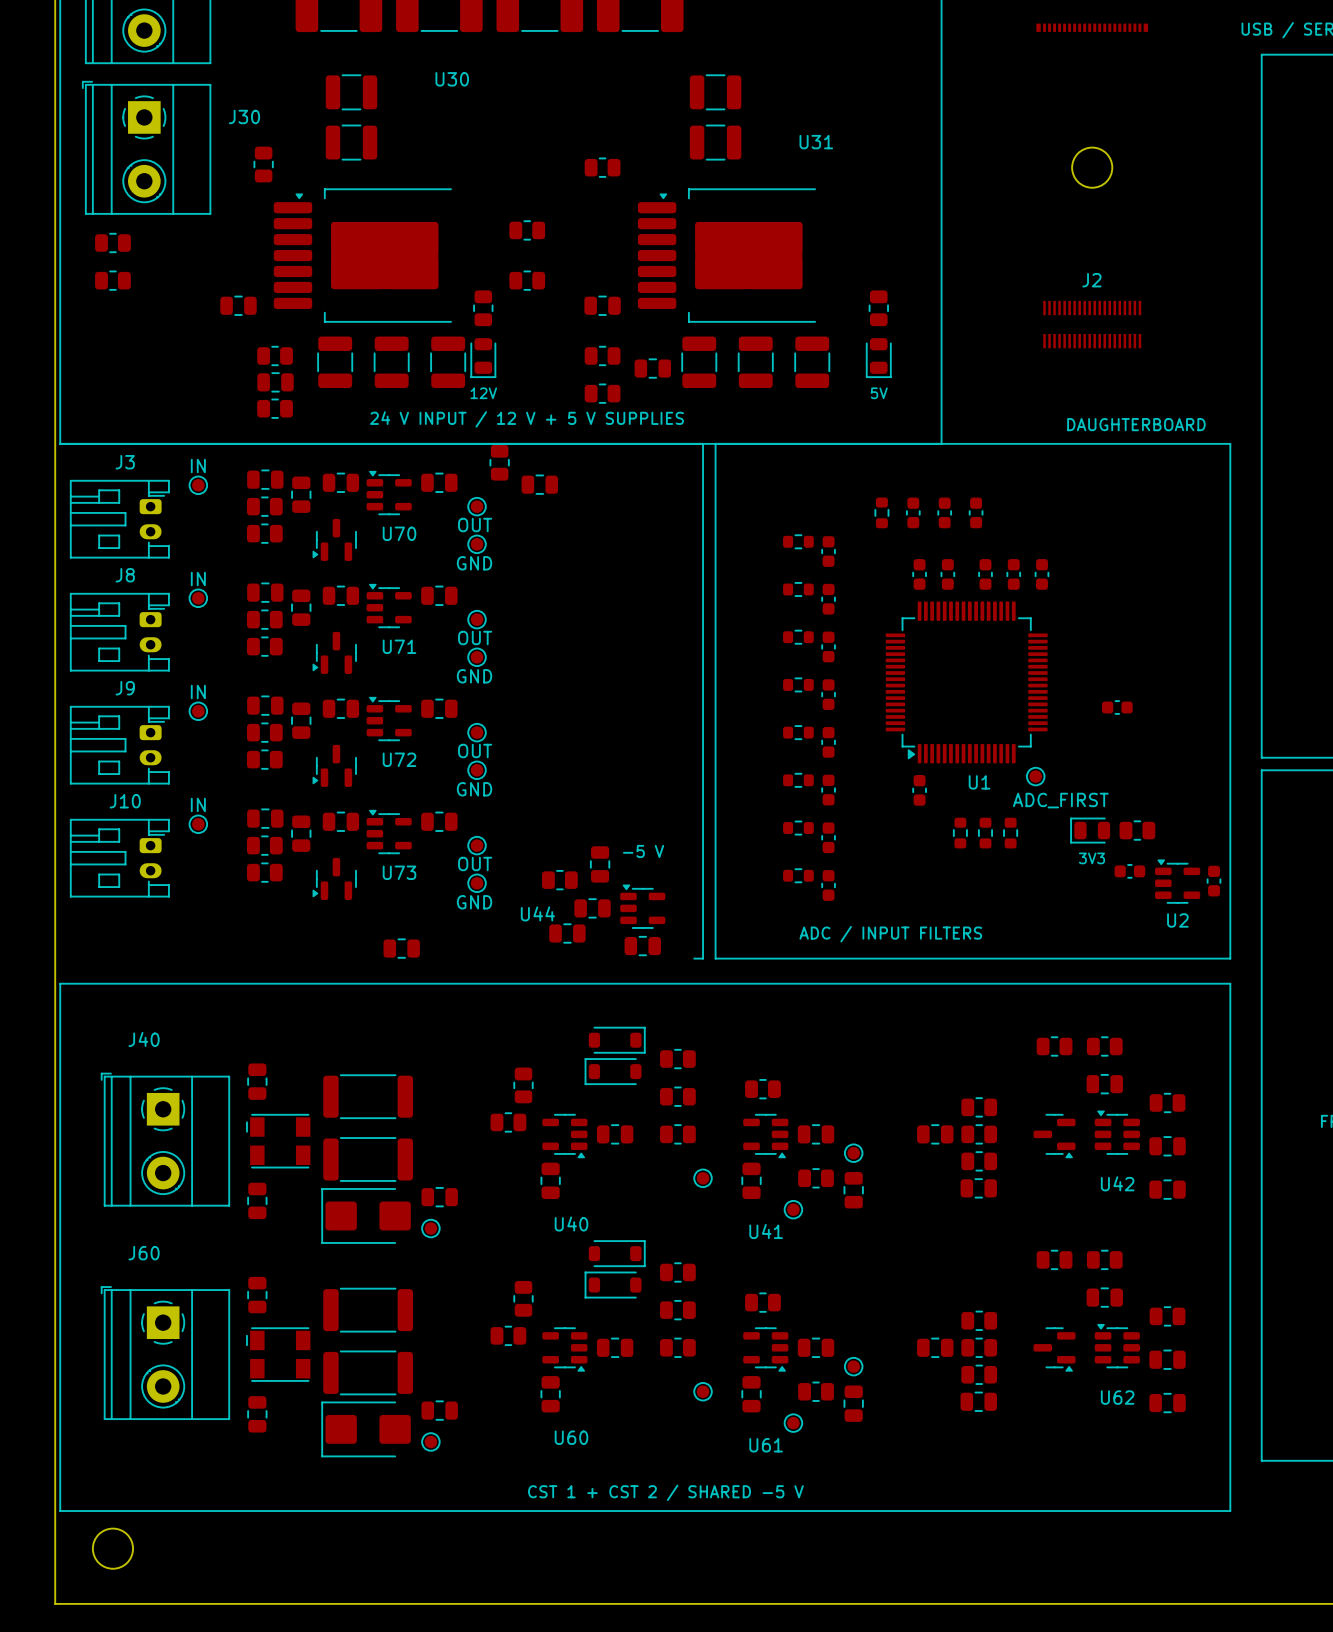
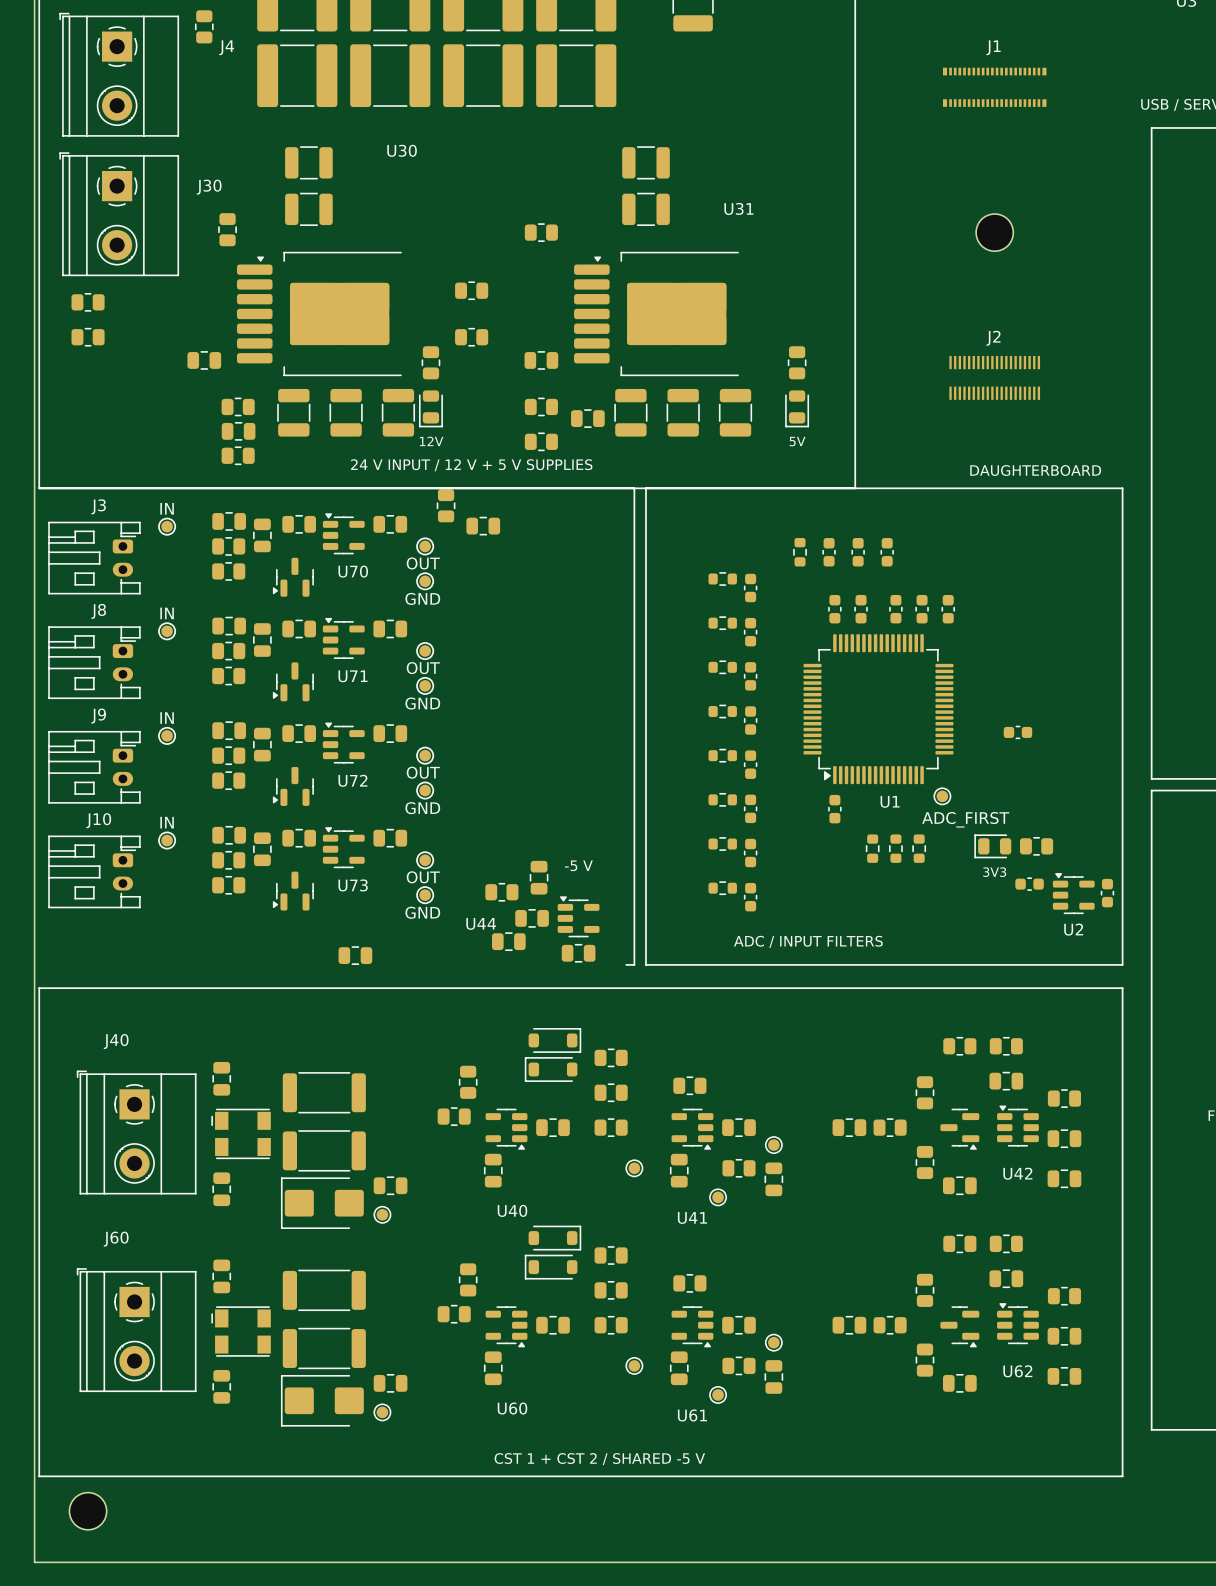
part: none -> (924, 1092)
part: (979, 1107) -> none
part: (979, 1161) -> none
part: none -> (924, 1162)
part position: (978, 1188) -> (959, 1185)
part: none -> (924, 1290)
part: (979, 1320) -> none
part: (979, 1374) -> none
part: none -> (924, 1360)
part position: (978, 1401) -> (959, 1383)

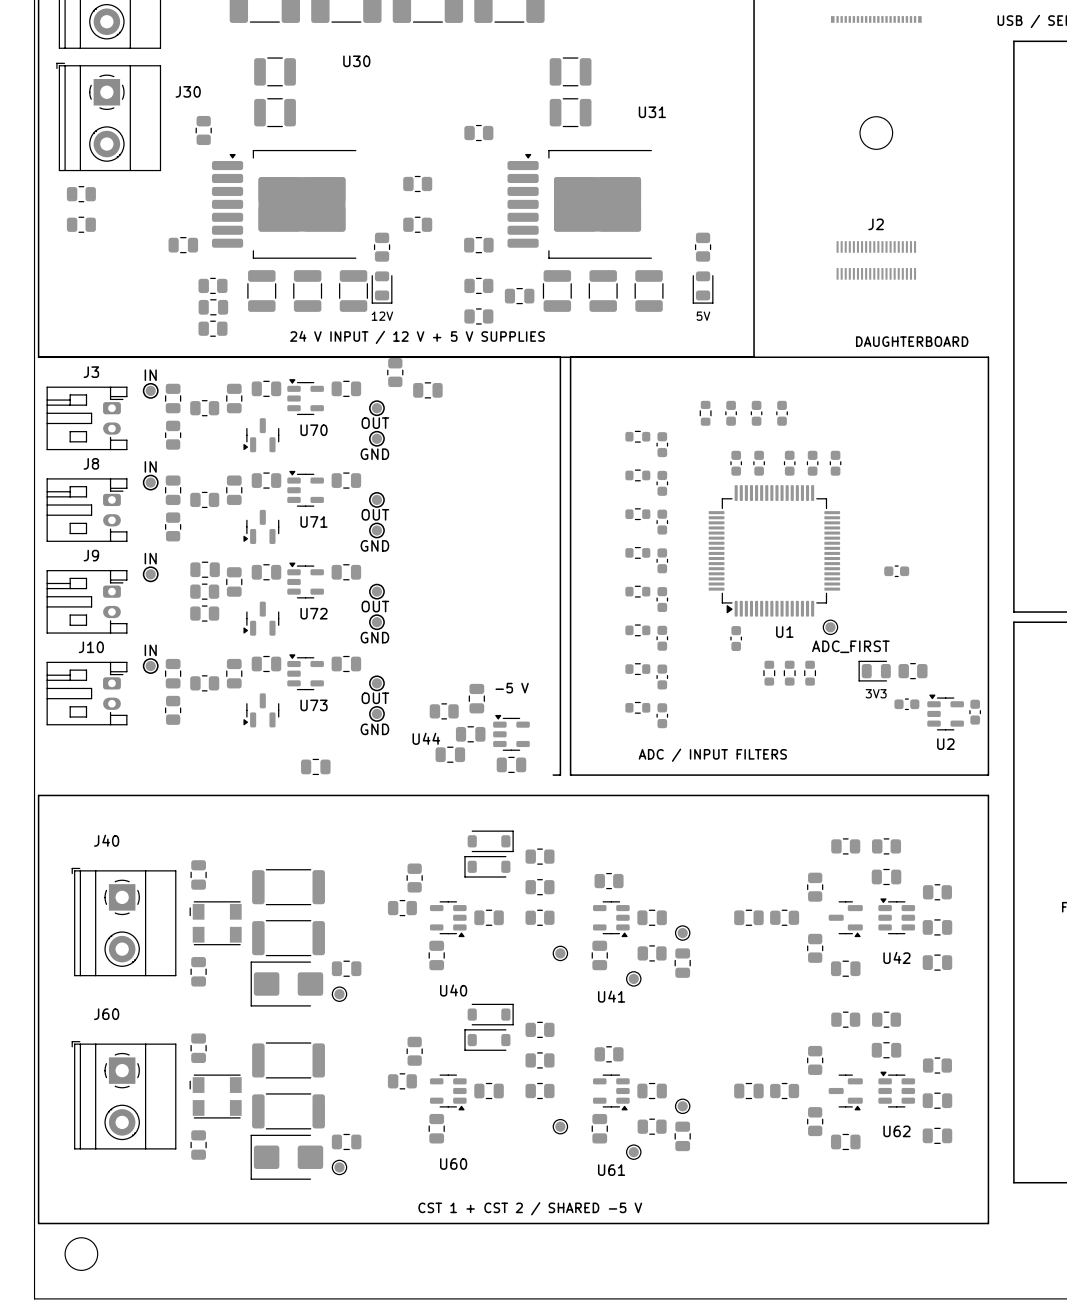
part rotation: 0° (229, 521) -> 90° clockwise (173, 398)
part position: (229, 521) -> (173, 398)
part rotation: 0° (228, 571) -> 90° clockwise (173, 435)
part position: (228, 571) -> (173, 435)
part rotation: 0° (229, 626) -> 90° clockwise (173, 490)
part position: (229, 626) -> (173, 490)
part rotation: 0° (228, 676) -> 90° clockwise (173, 526)
part position: (228, 676) -> (173, 526)
part rotation: 0° (229, 835) -> 90° clockwise (173, 673)
part position: (229, 835) -> (173, 673)
part rotation: 0° (228, 885) -> 90° clockwise (173, 710)
part position: (228, 885) -> (173, 710)

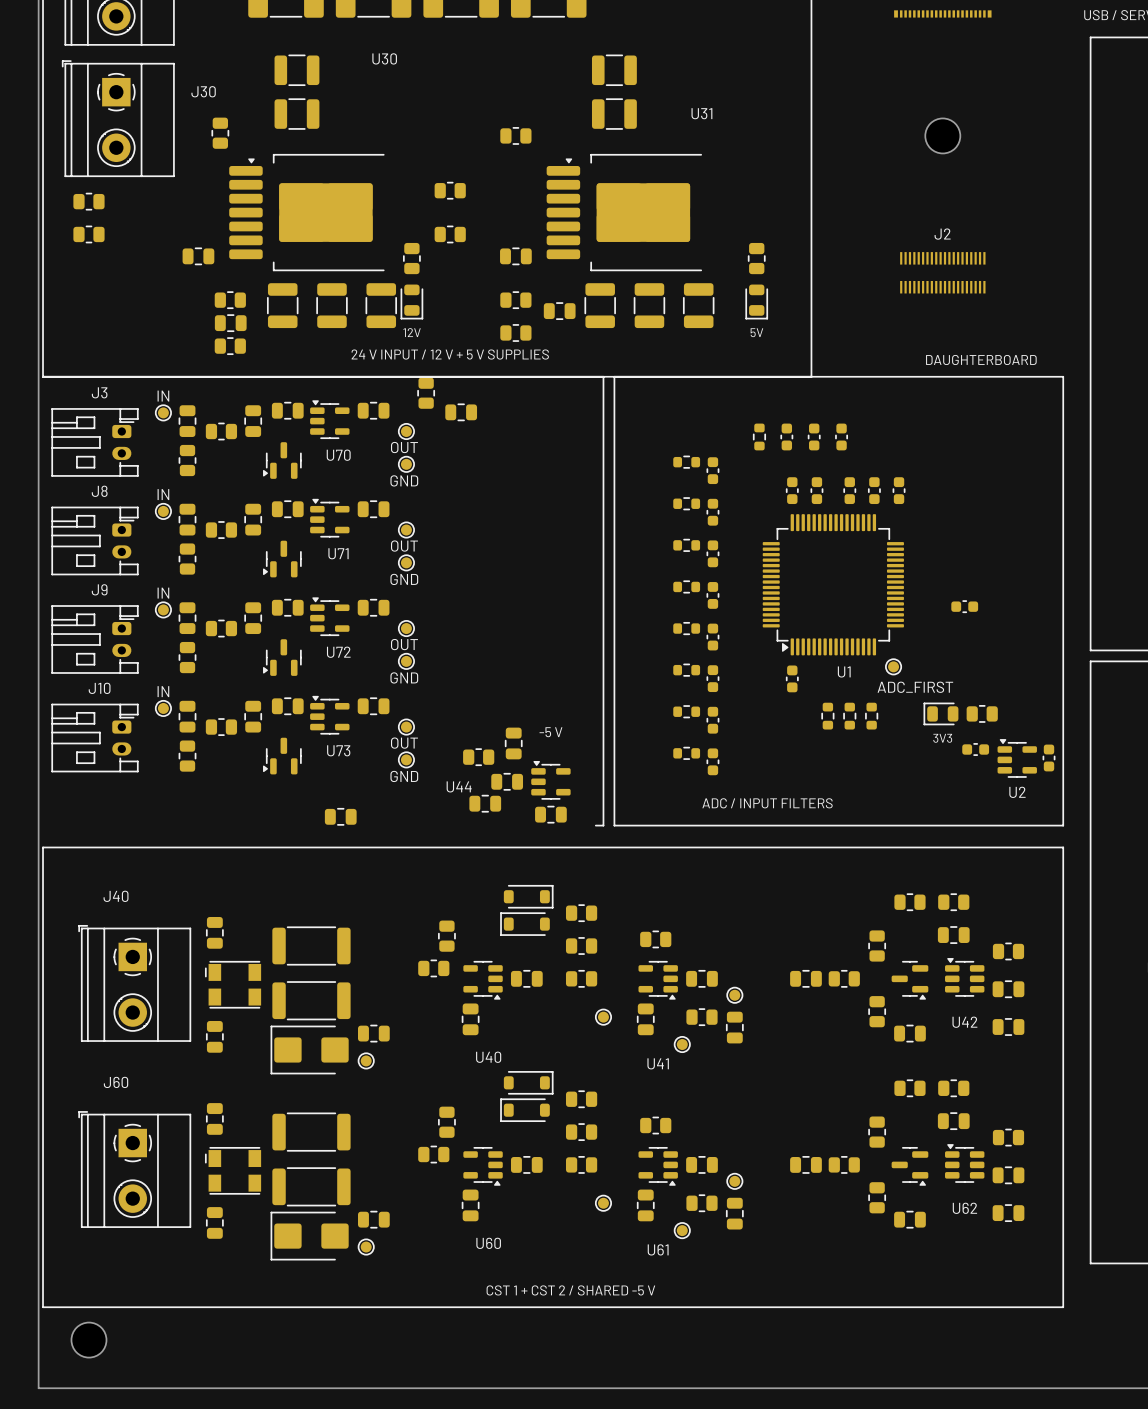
part rotation: 0° (205, 569) -> 90° clockwise (187, 618)
part position: (205, 569) -> (187, 618)
part rotation: 0° (204, 613) -> 90° clockwise (187, 657)
part position: (204, 613) -> (187, 657)

